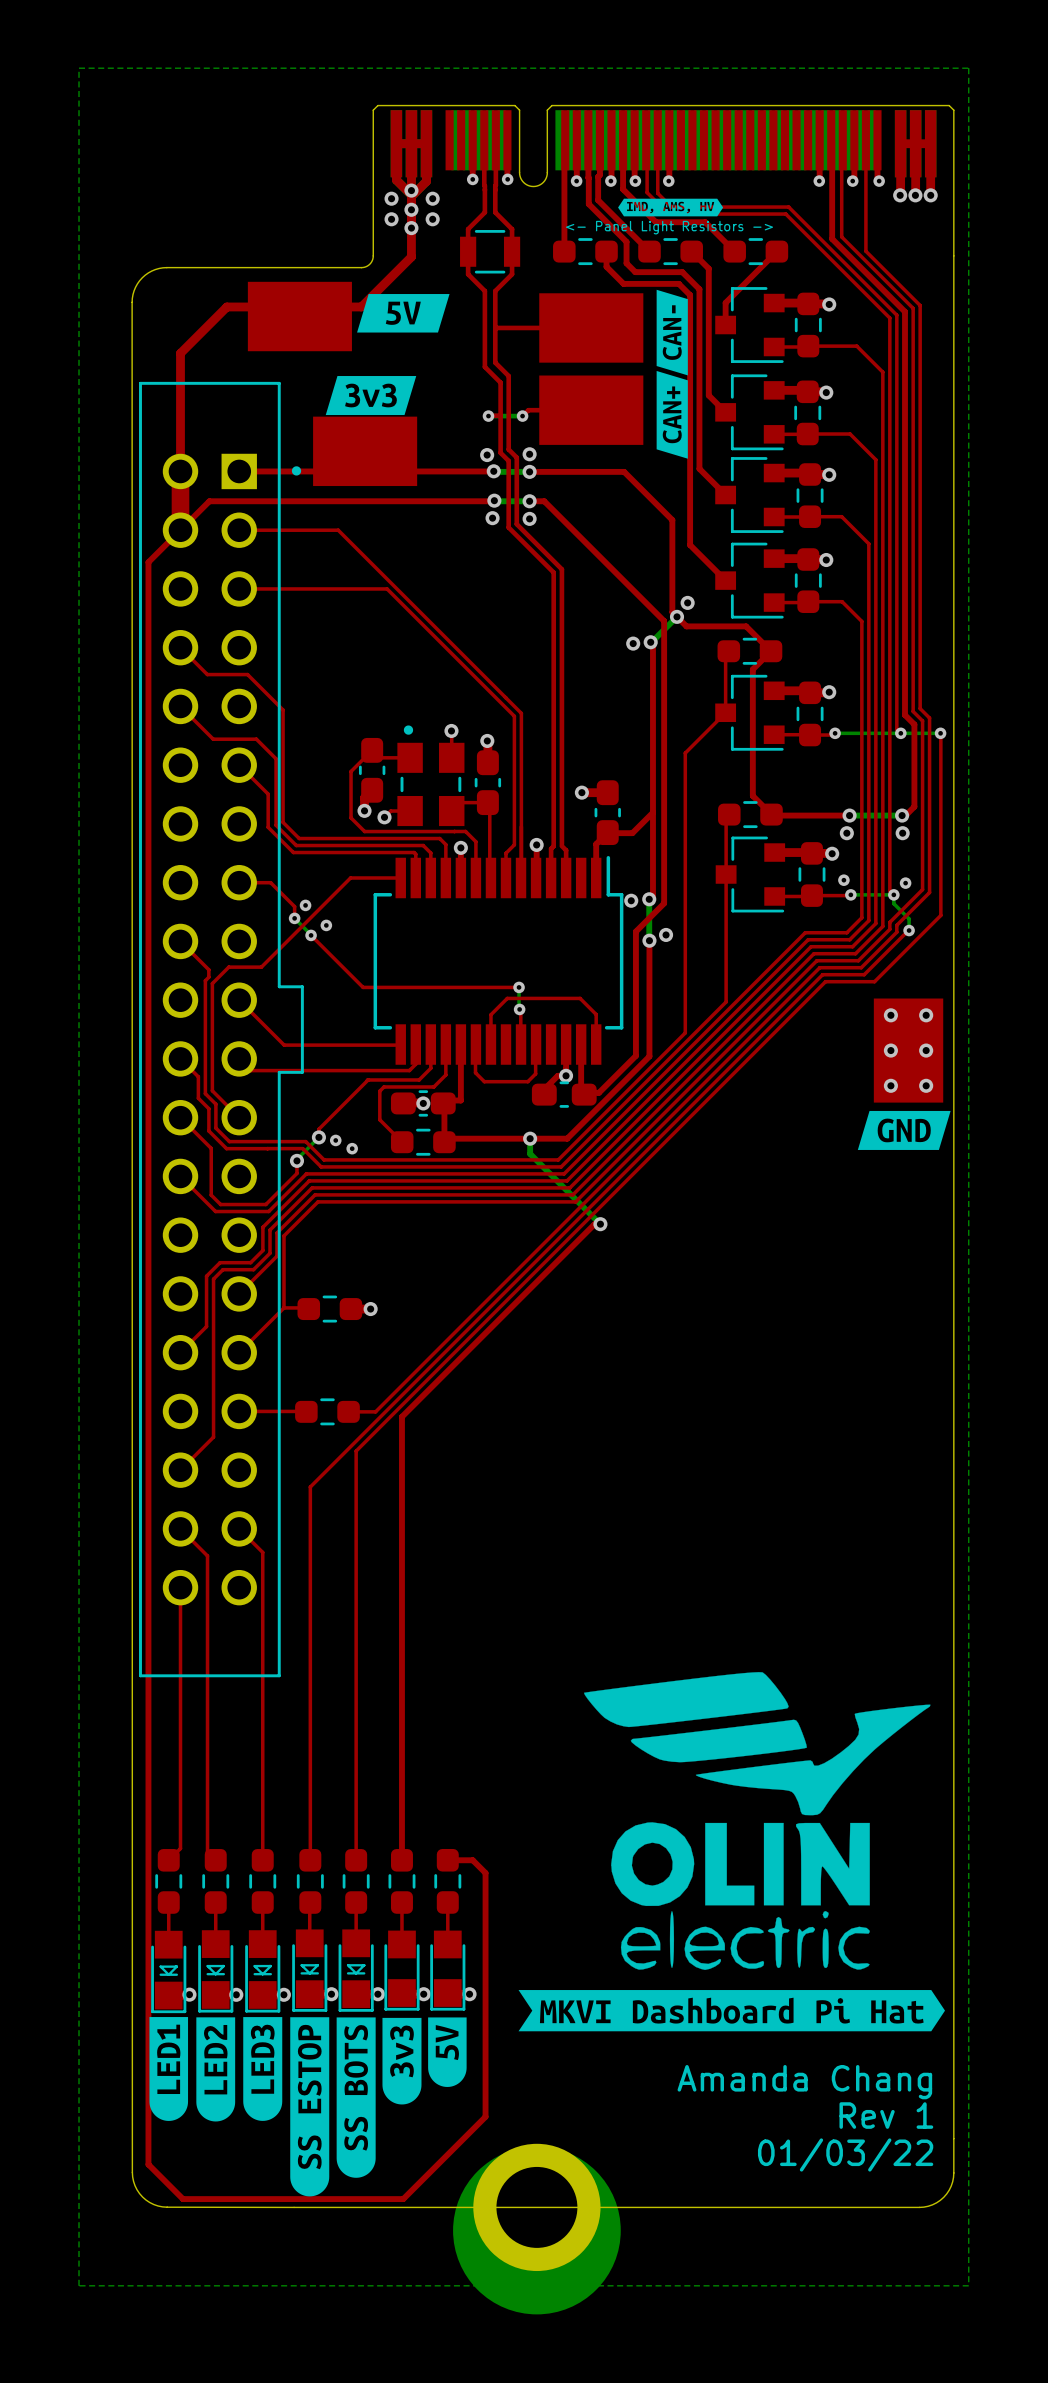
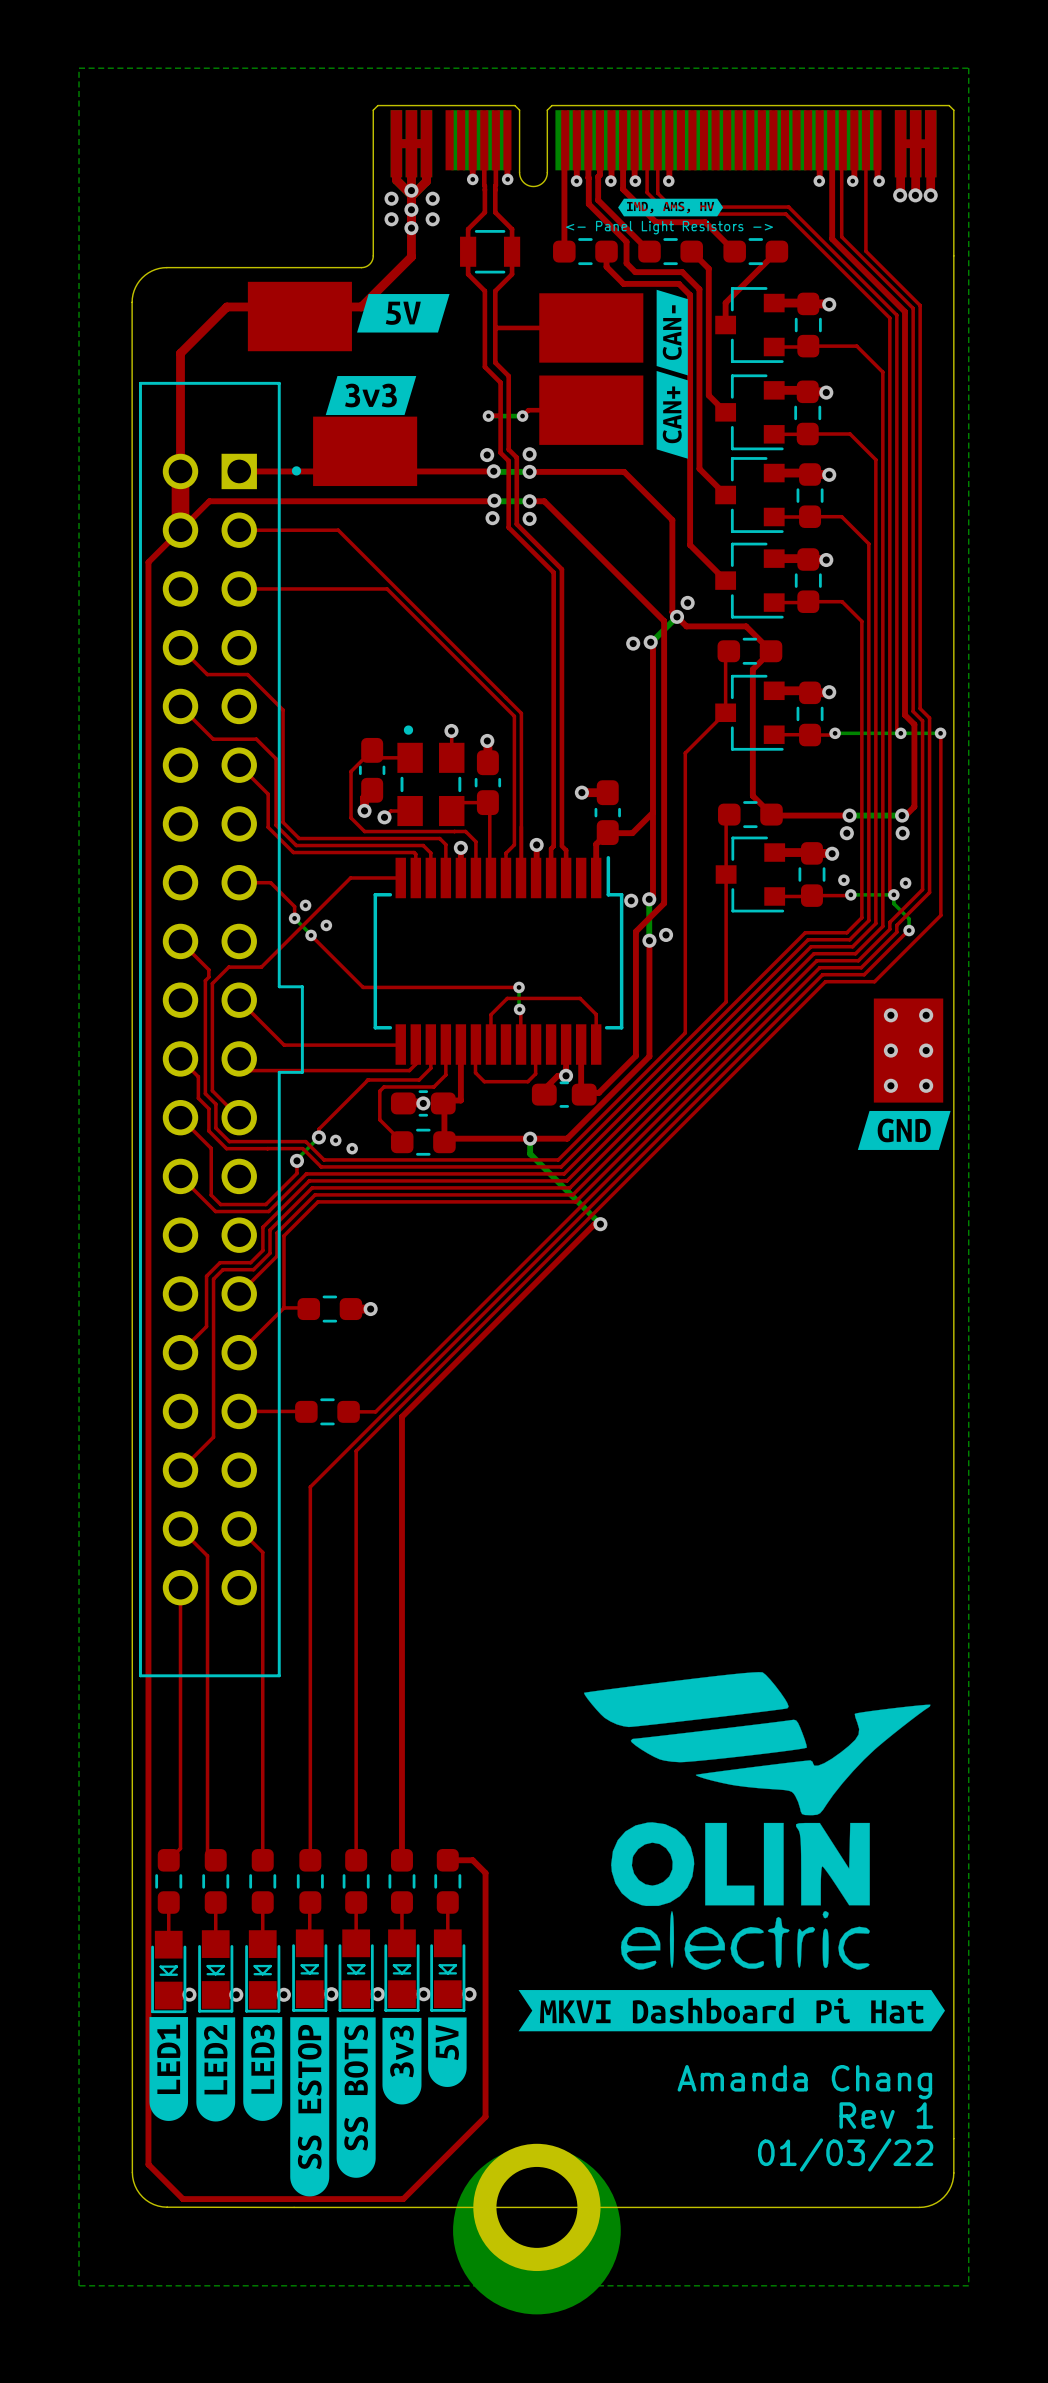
part footprint: [384, 1930, 420, 2011] -> [384, 1929, 420, 2012]
part footprint: [430, 1930, 466, 2011] -> [430, 1929, 466, 2012]

